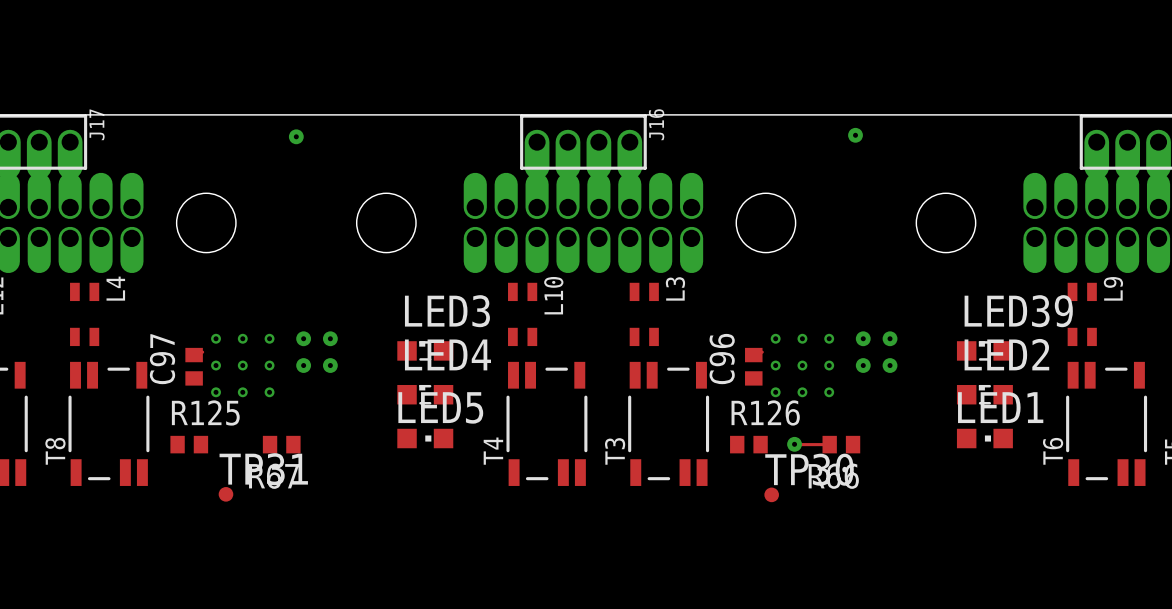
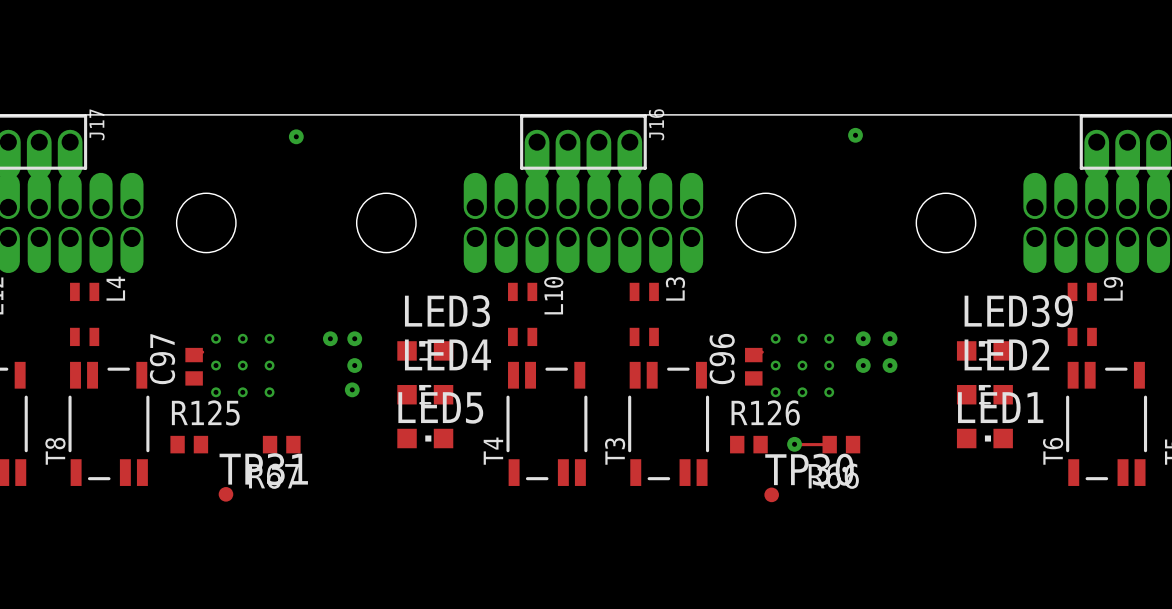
via: (303, 338) -> none
via: none -> (354, 338)
via: (303, 365) -> none
via: (330, 365) -> none
via: none -> (354, 365)
via: none -> (352, 389)

